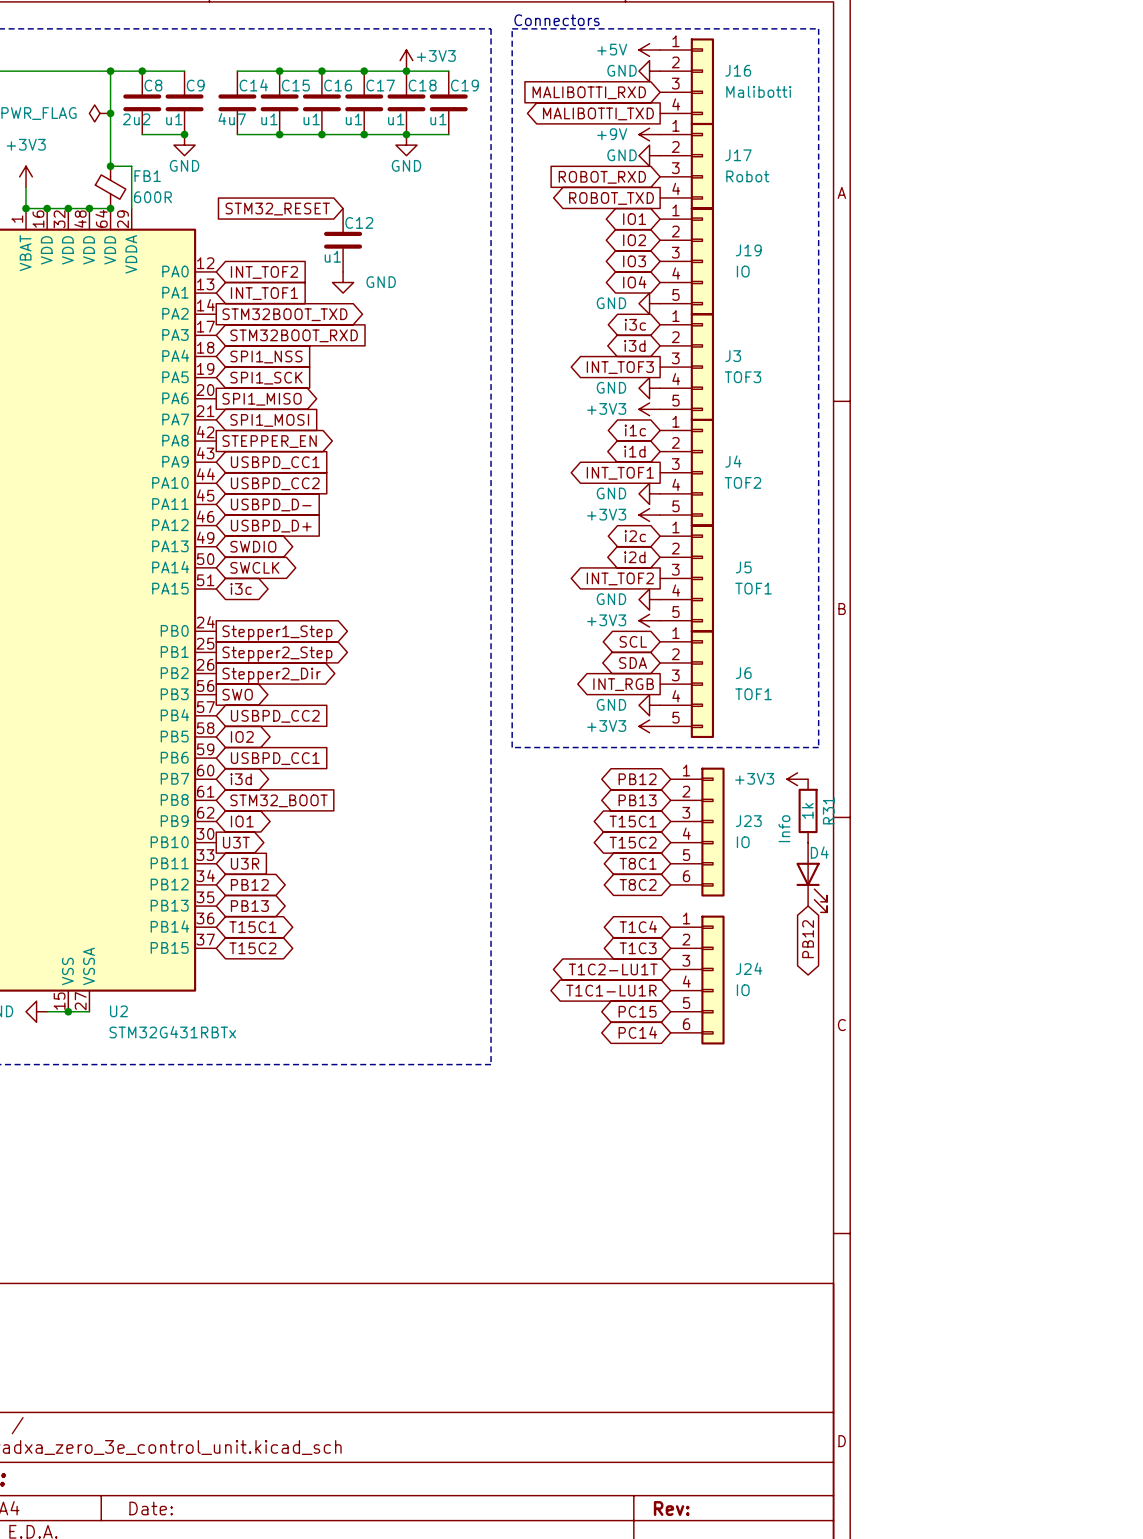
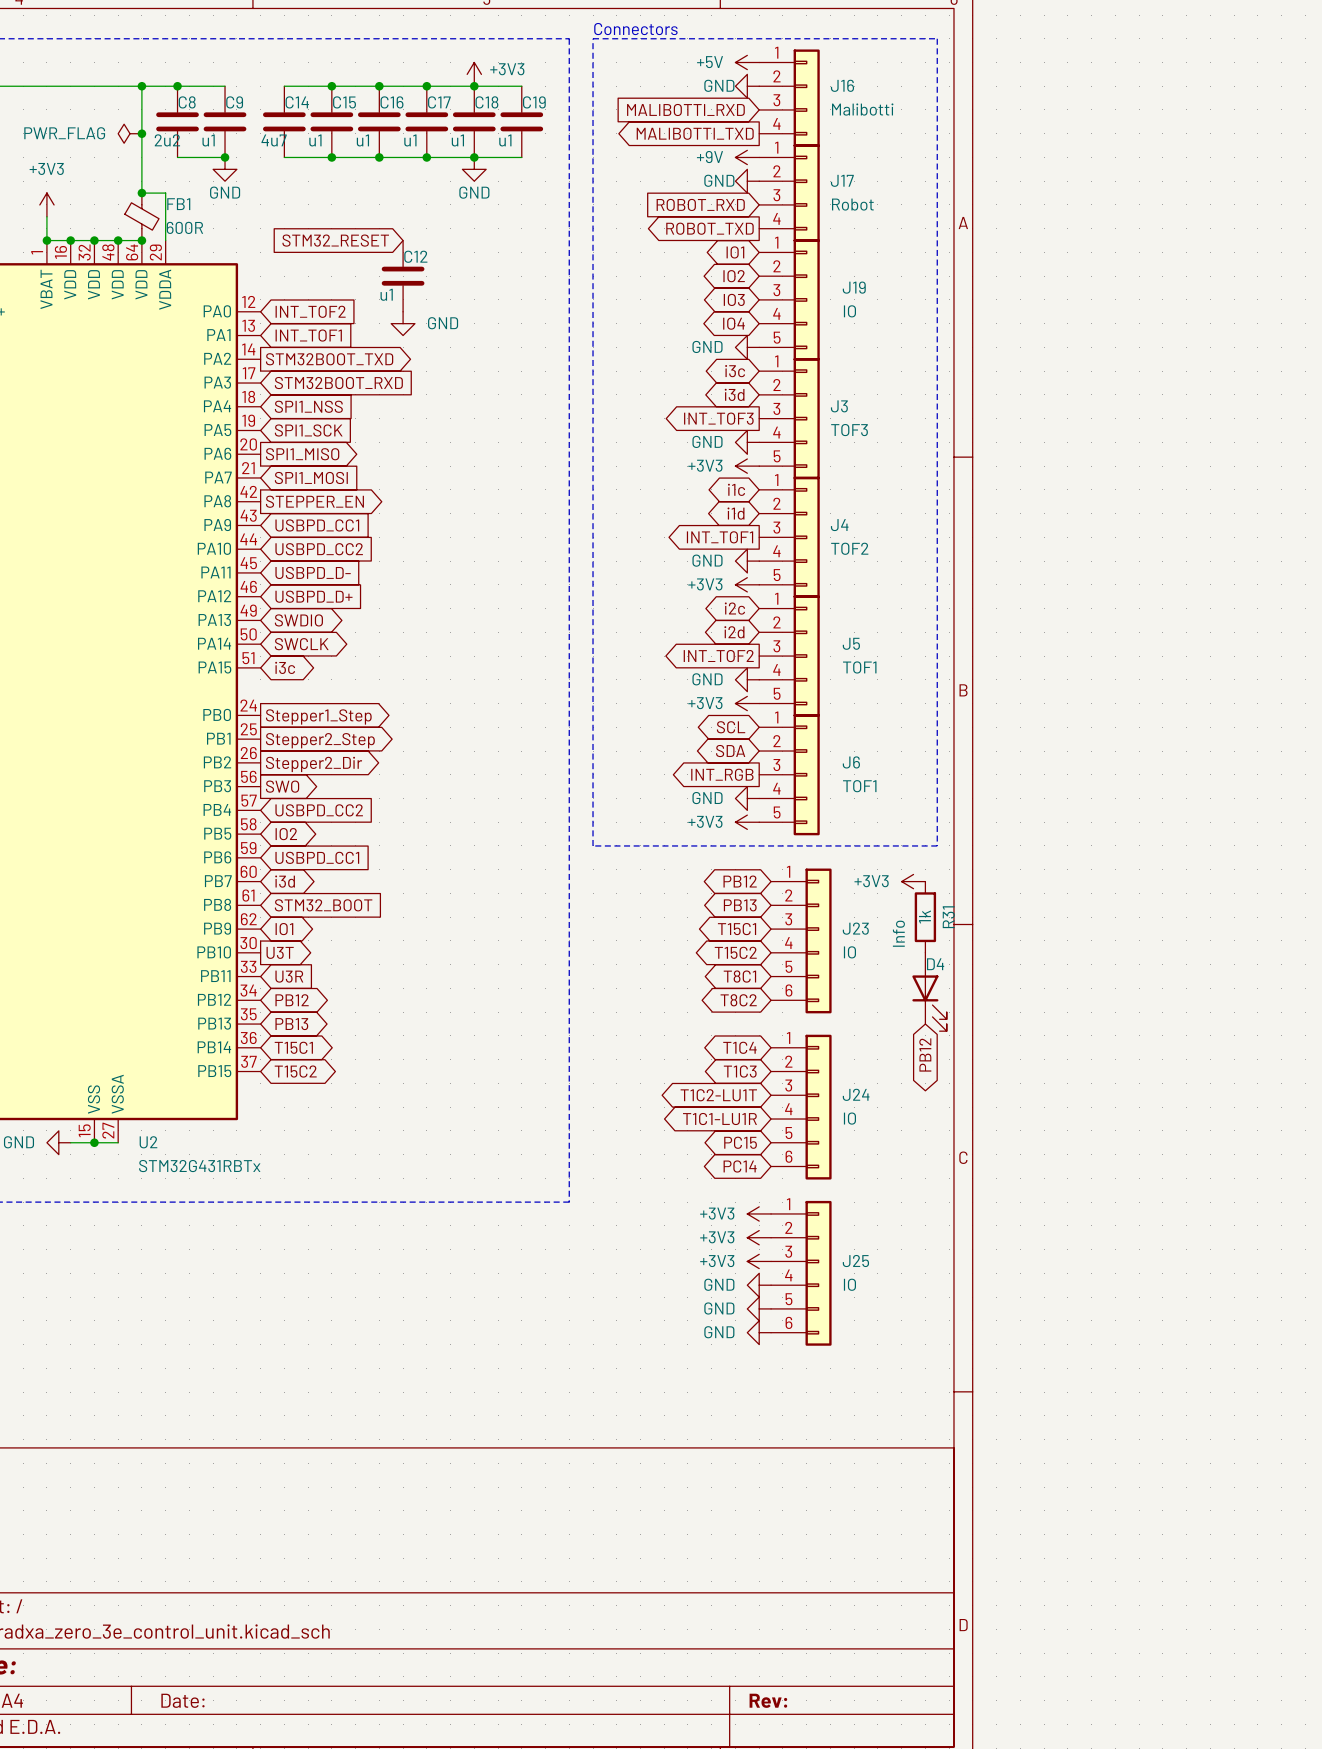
power symbol: none -> +3V3 (759, 1213)
power symbol: none -> +3V3 (759, 1237)
power symbol: none -> +3V3 (759, 1261)
J25: none -> IO (801, 1273)
power symbol: none -> GND (759, 1285)
power symbol: none -> GND (759, 1308)
power symbol: none -> GND (759, 1332)

